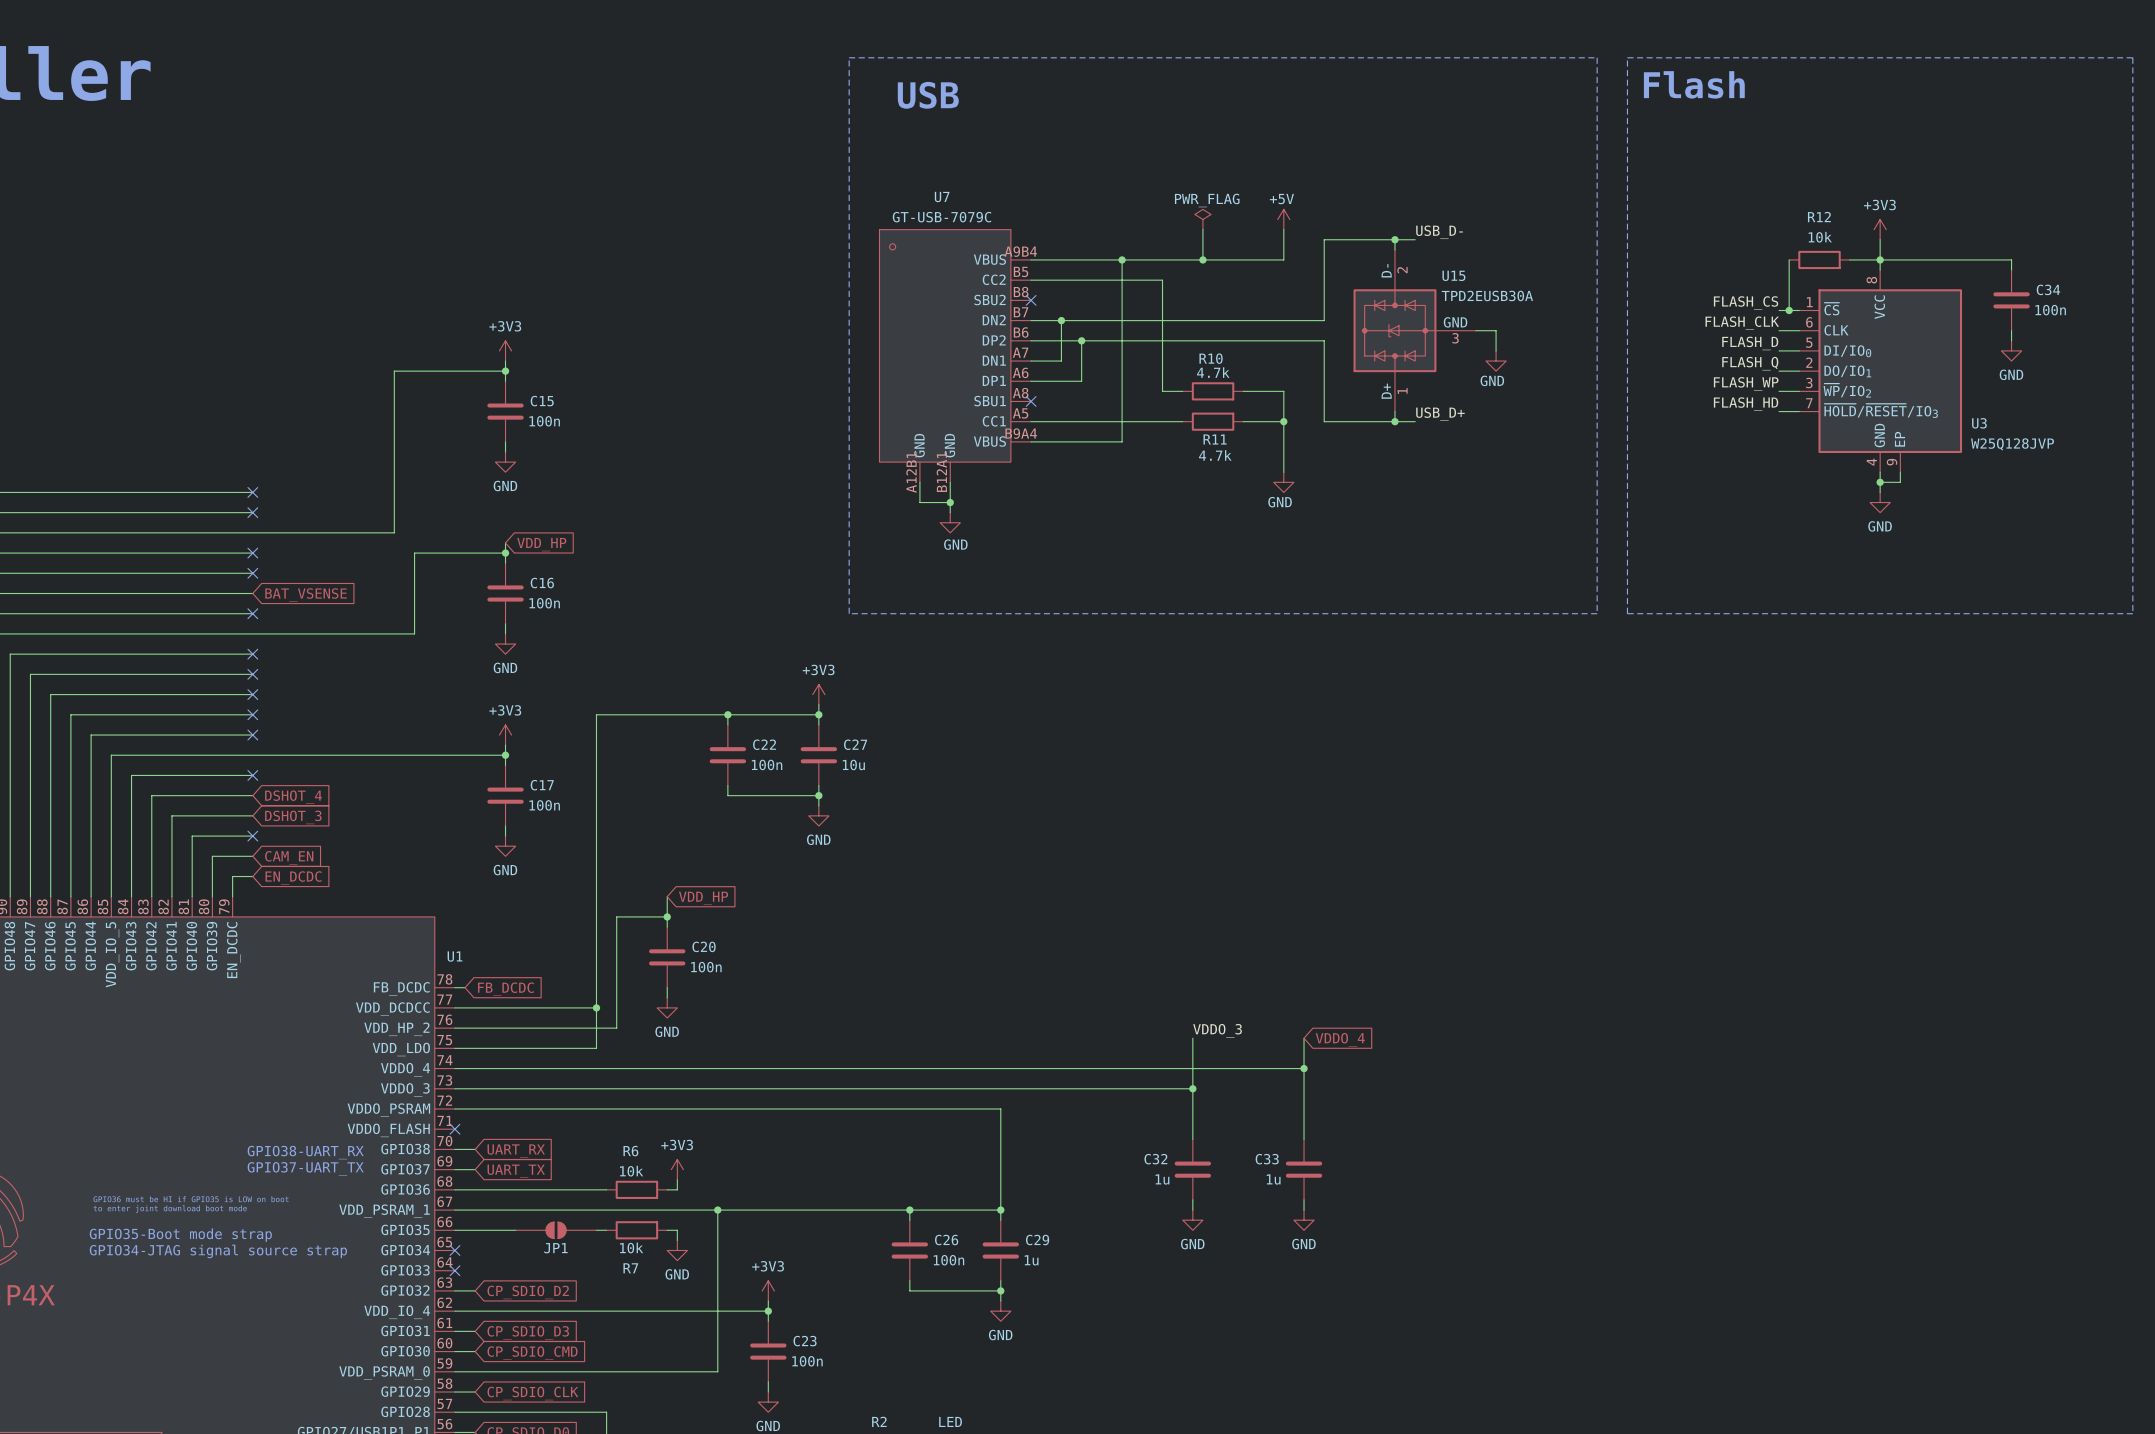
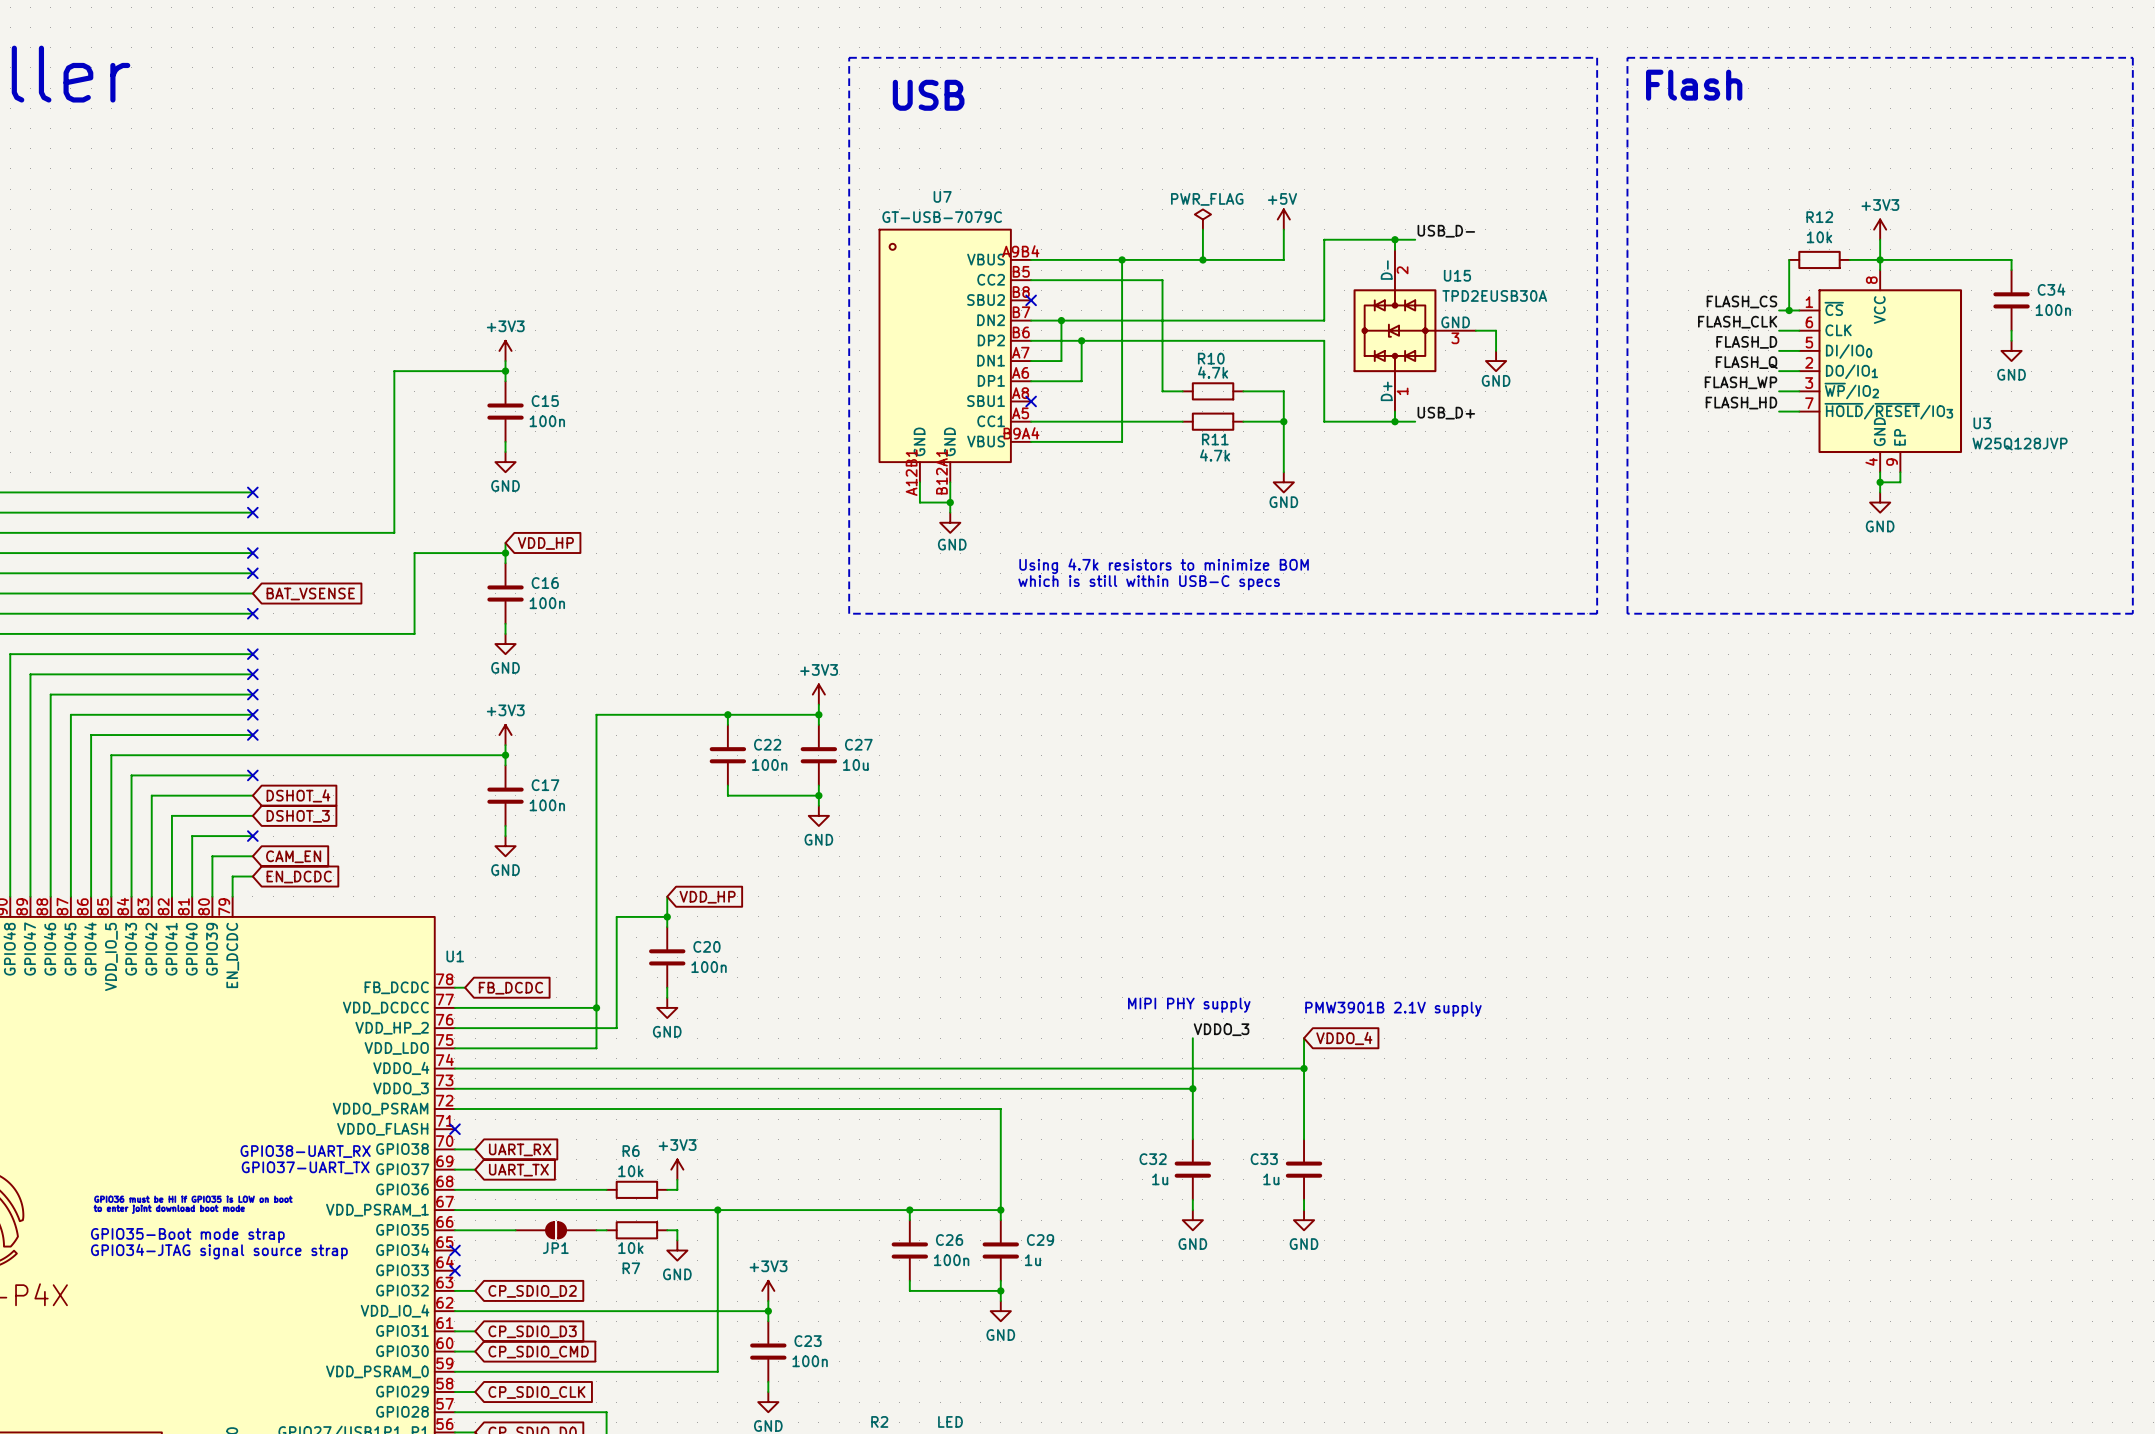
text: none -> Using 4.7k resistors to minimize BOM (1164, 566)
text: none -> which is still within USB-C specs (1149, 582)
text: none -> MIPI PHY supply (1189, 1005)
text: none -> PMW3901B 2.1V supply (1393, 1009)

